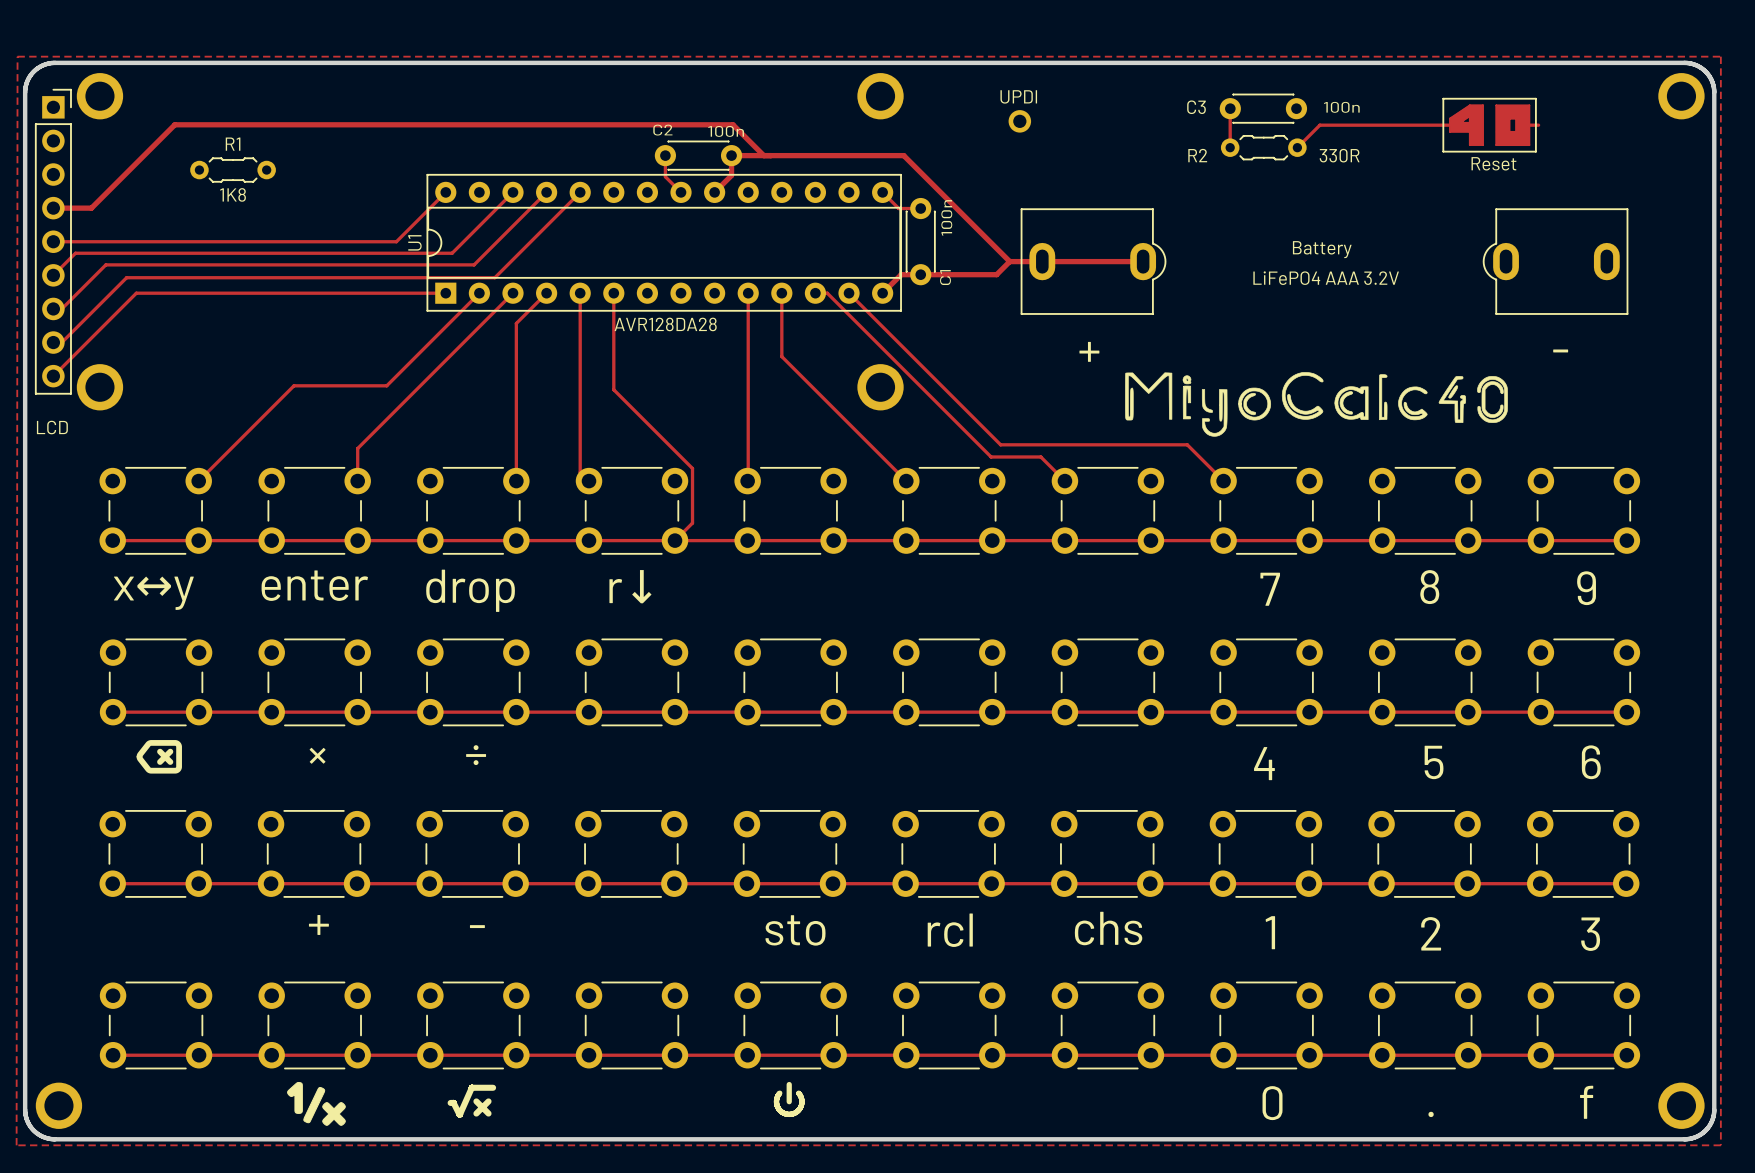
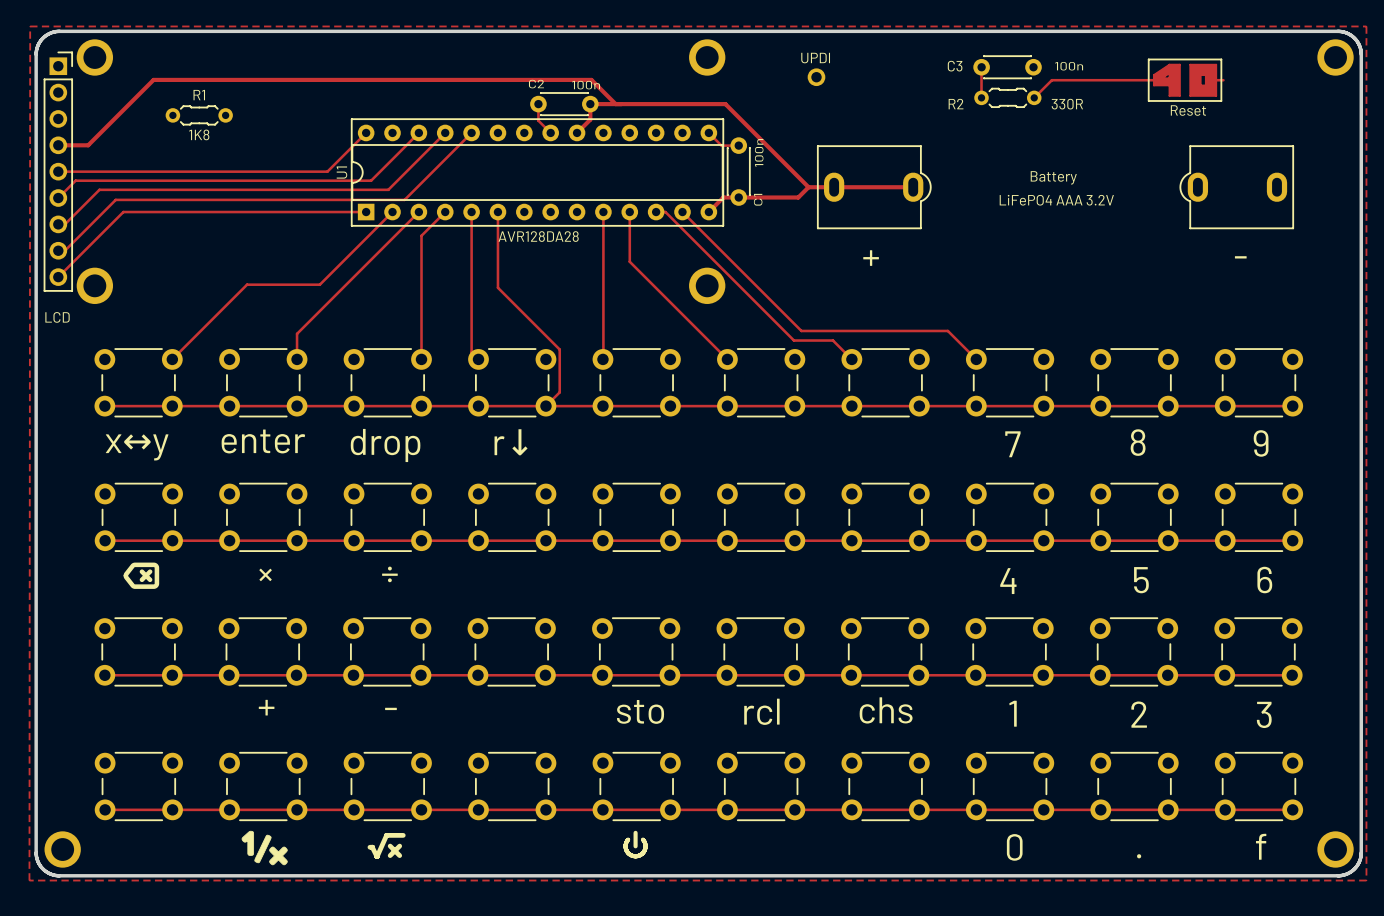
drawing: [1125, 372, 1508, 437] -> none

